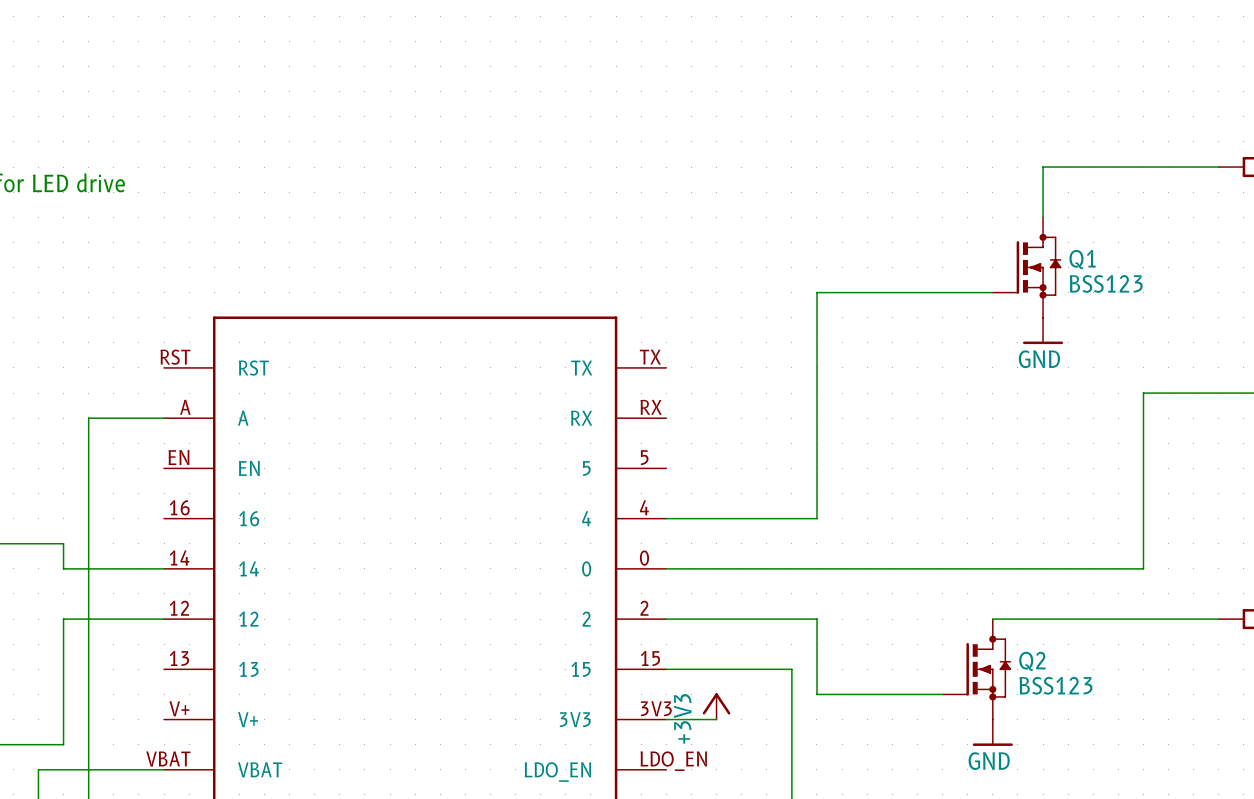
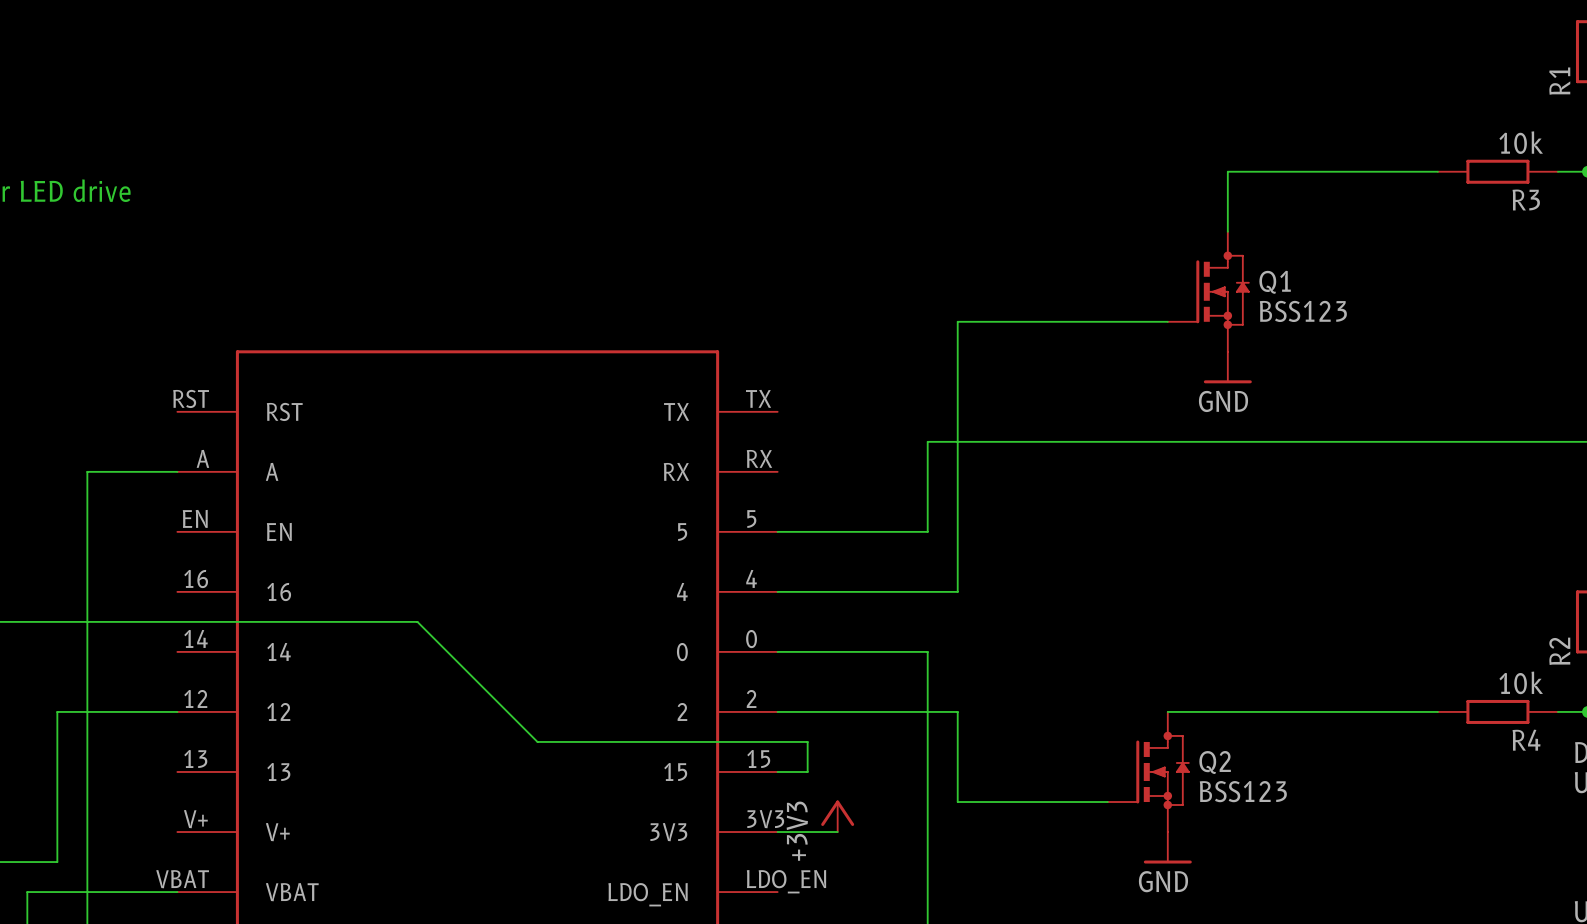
wire: (1143, 393) (1143, 568) (791, 568) -> (1347, 441) (927, 441) (927, 531) (777, 531)
wire: (63, 543) (63, 568) (164, 568) -> (57, 621) (417, 621) (537, 741) (807, 741) (807, 771)
wire: (691, 669) (791, 669) -> (927, 651) (927, 771)

